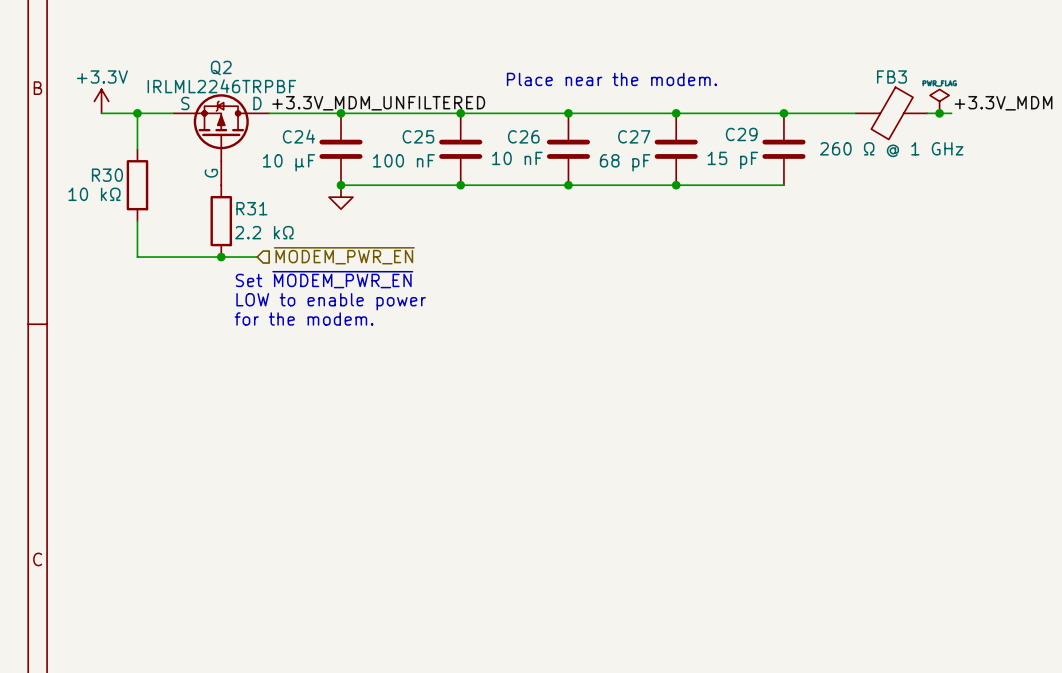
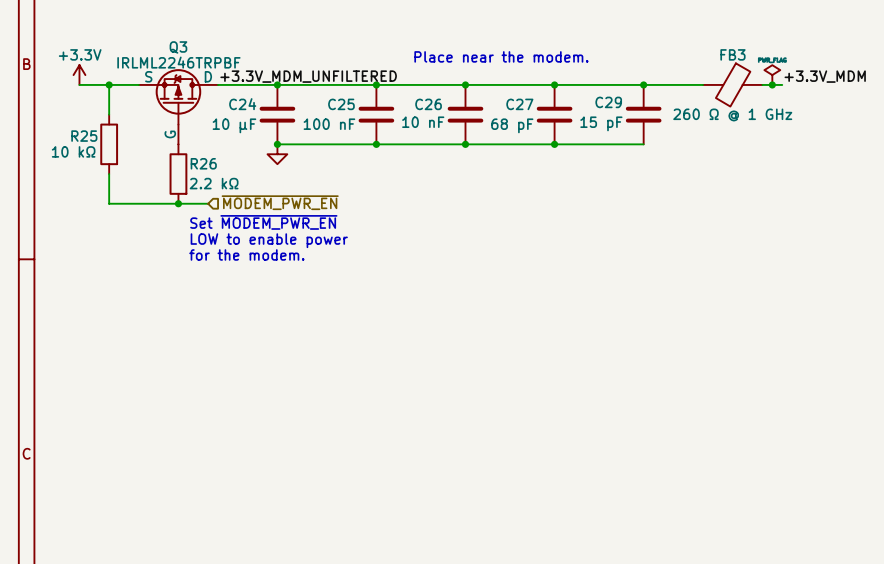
Q2 name: Q2 (221, 68) -> Q3 (178, 47)
R30 name: R30 (107, 175) -> R25 (84, 136)
R31 name: R31 (251, 208) -> R26 (203, 163)

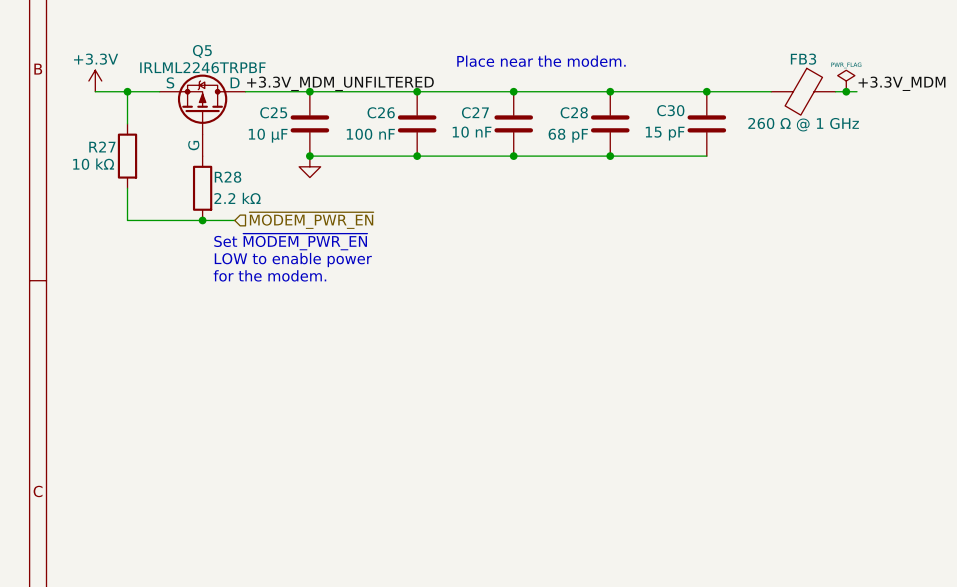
Q3 name: Q3 (178, 47) -> Q5 (202, 51)
C29 name: C29 (608, 102) -> C30 (670, 110)
C24 name: C24 (242, 104) -> C25 (273, 112)
C25 name: C25 (341, 104) -> C26 (381, 112)
C26 name: C26 (428, 104) -> C27 (475, 112)
C27 name: C27 (519, 104) -> C28 (574, 112)
R25 name: R25 (84, 136) -> R27 (102, 147)
R26 name: R26 (203, 163) -> R28 (228, 177)

